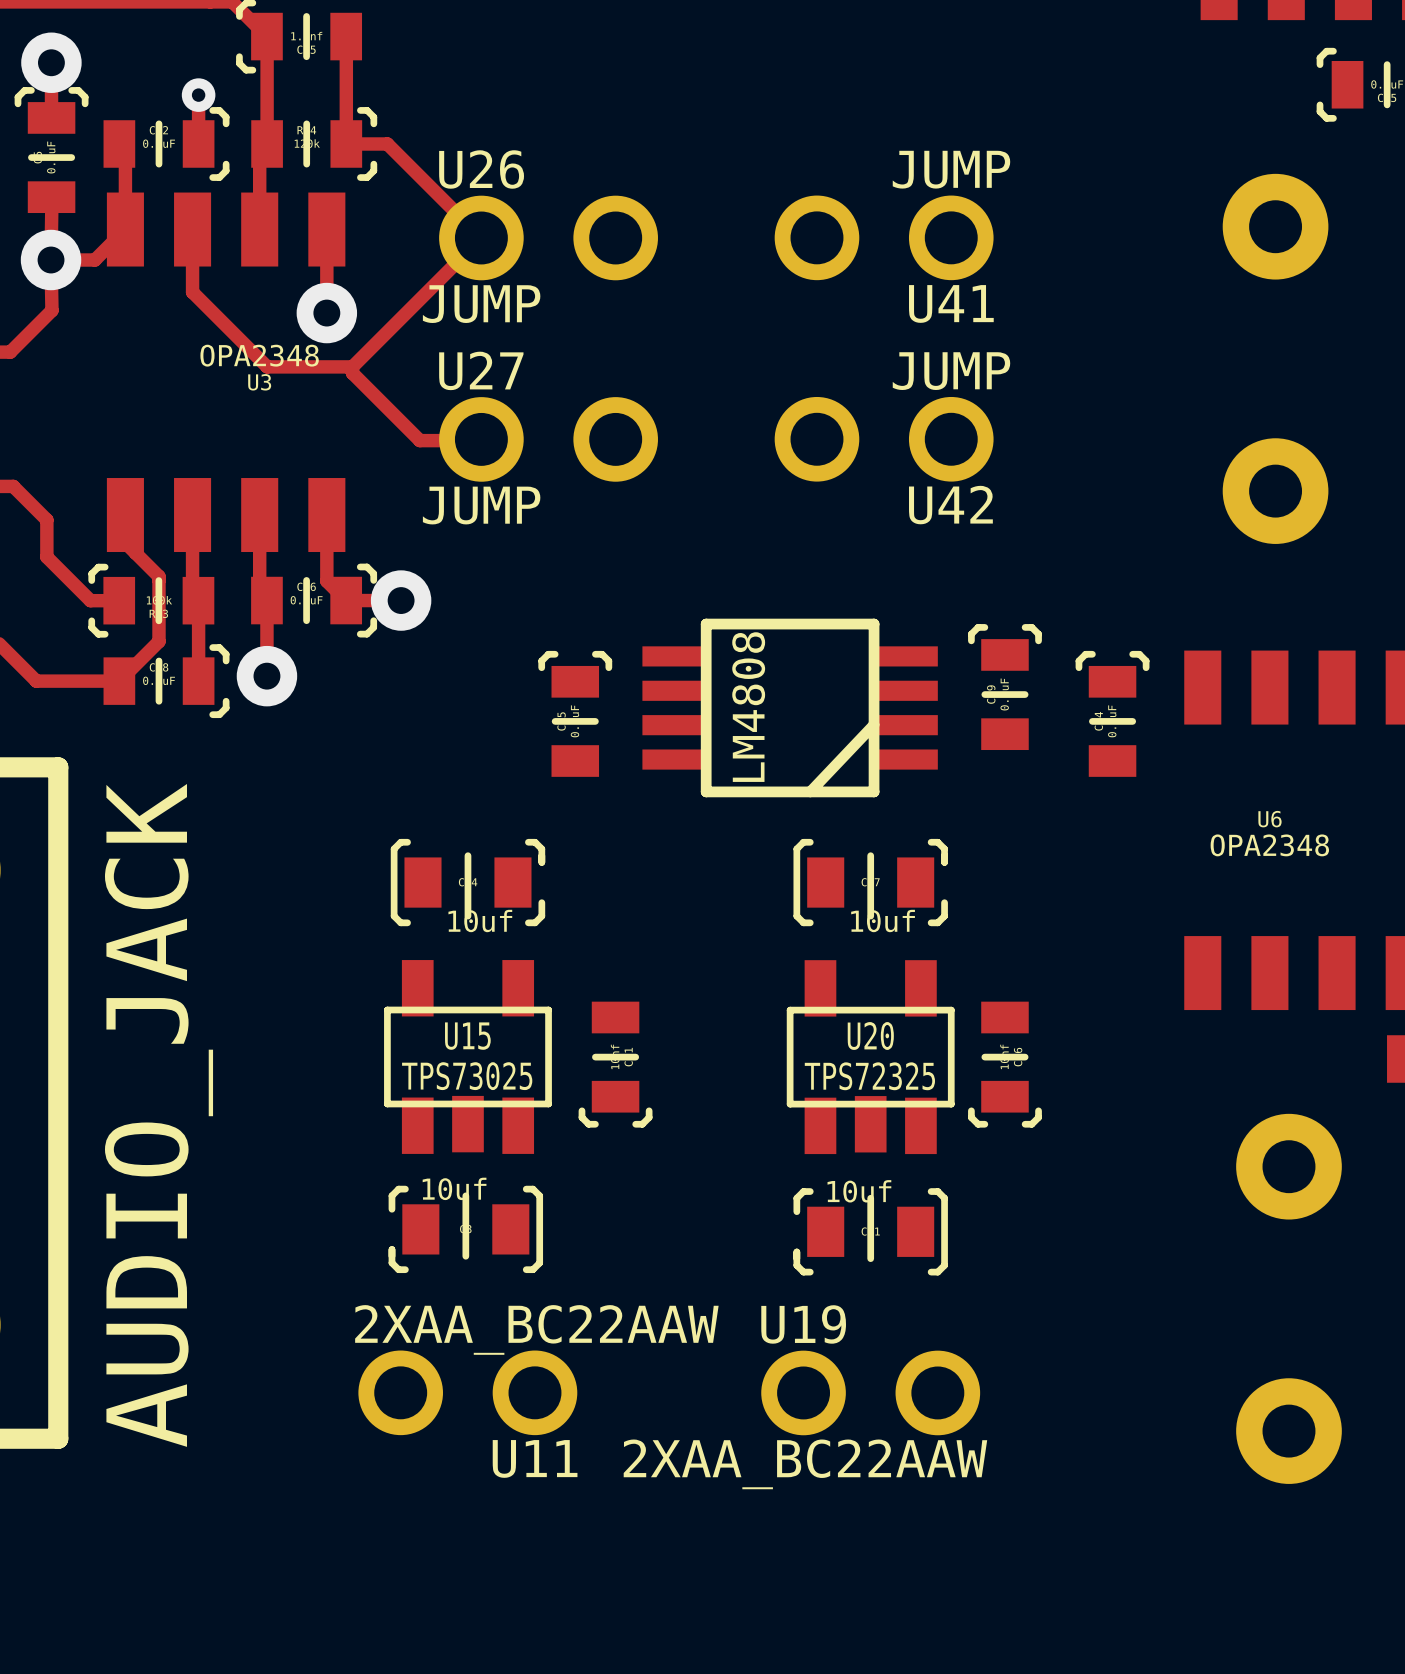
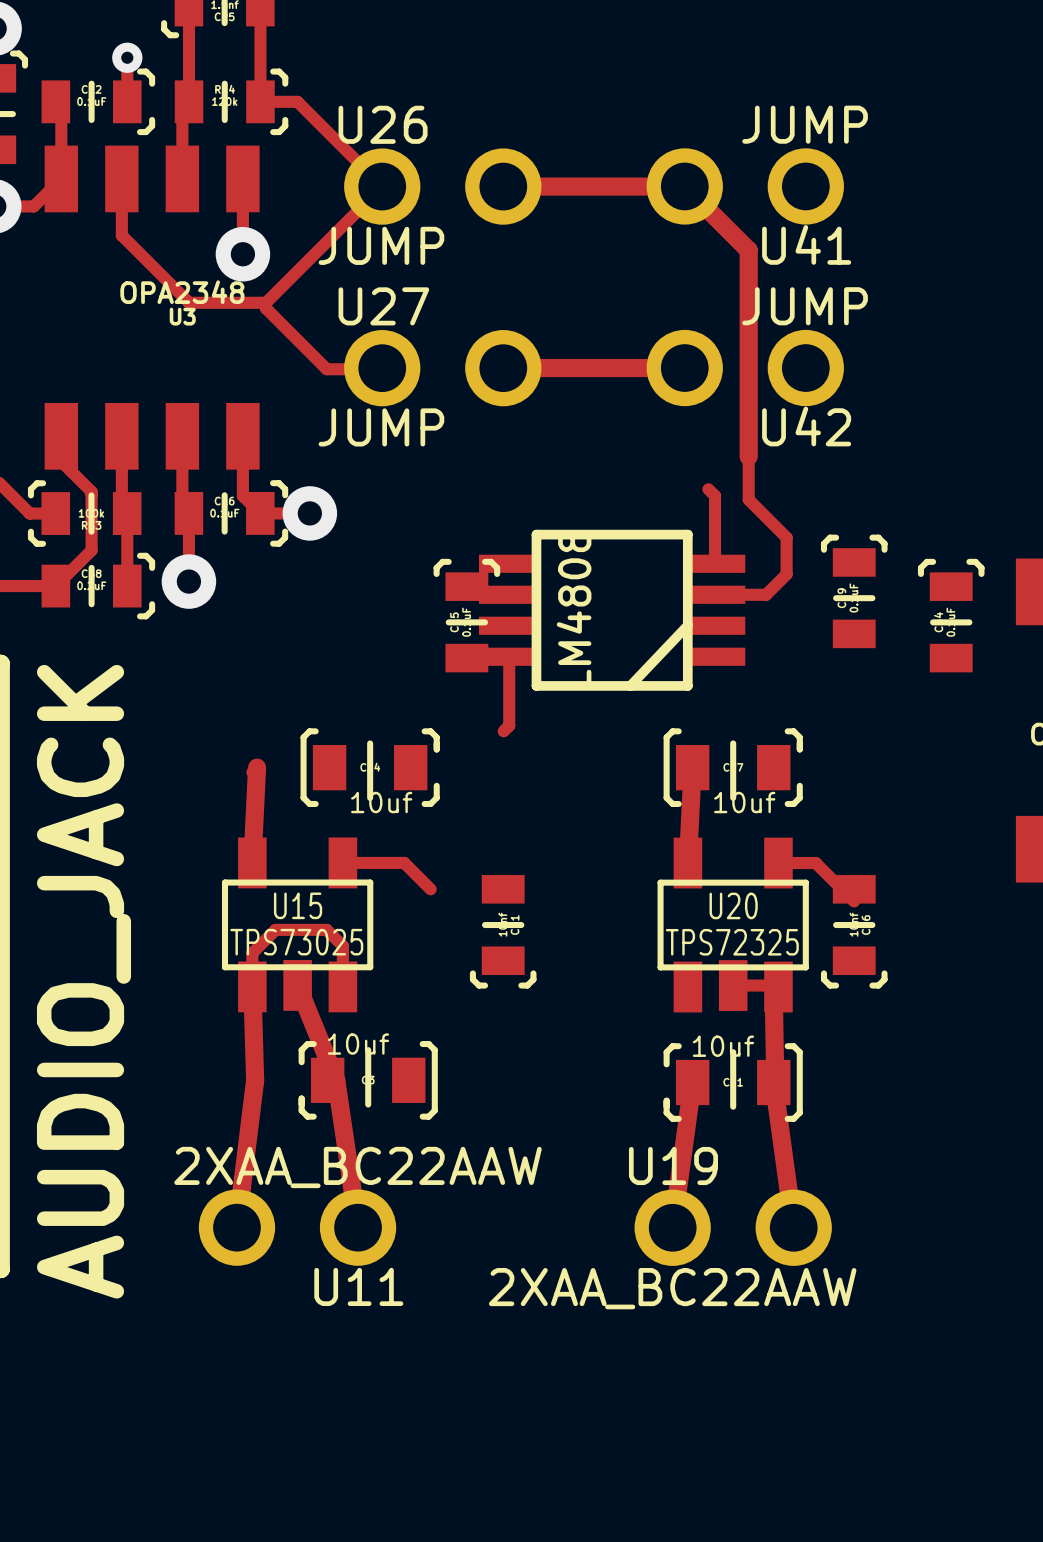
track: none -> (503, 186) (684, 186) (748, 250) (748, 499) (786, 537) (786, 574) (766, 594) (715, 594)
track: none -> (503, 368) (684, 368)
track: none -> (708, 489) (715, 495) (715, 563)
part position: (790, 707) -> (612, 610)
track: none -> (509, 656) (509, 725) (503, 731)
track: none -> (252, 772) (257, 767) (252, 862)
track: none -> (687, 772) (692, 767) (687, 863)
track: none -> (342, 862) (404, 862) (430, 889)
track: none -> (778, 863) (815, 863) (854, 901)
U15 position: (467, 1056) -> (297, 924)
track: none -> (297, 985) (336, 1080) (358, 1227)
track: none -> (733, 985) (778, 987) (773, 991) (775, 1094)
track: none -> (342, 986) (342, 946) (326, 929) (275, 929) (252, 953) (255, 1080) (236, 1227)
track: none -> (692, 1082) (672, 1227)
track: none -> (773, 1082) (793, 1227)
U11 position: (467, 1392) -> (297, 1227)

